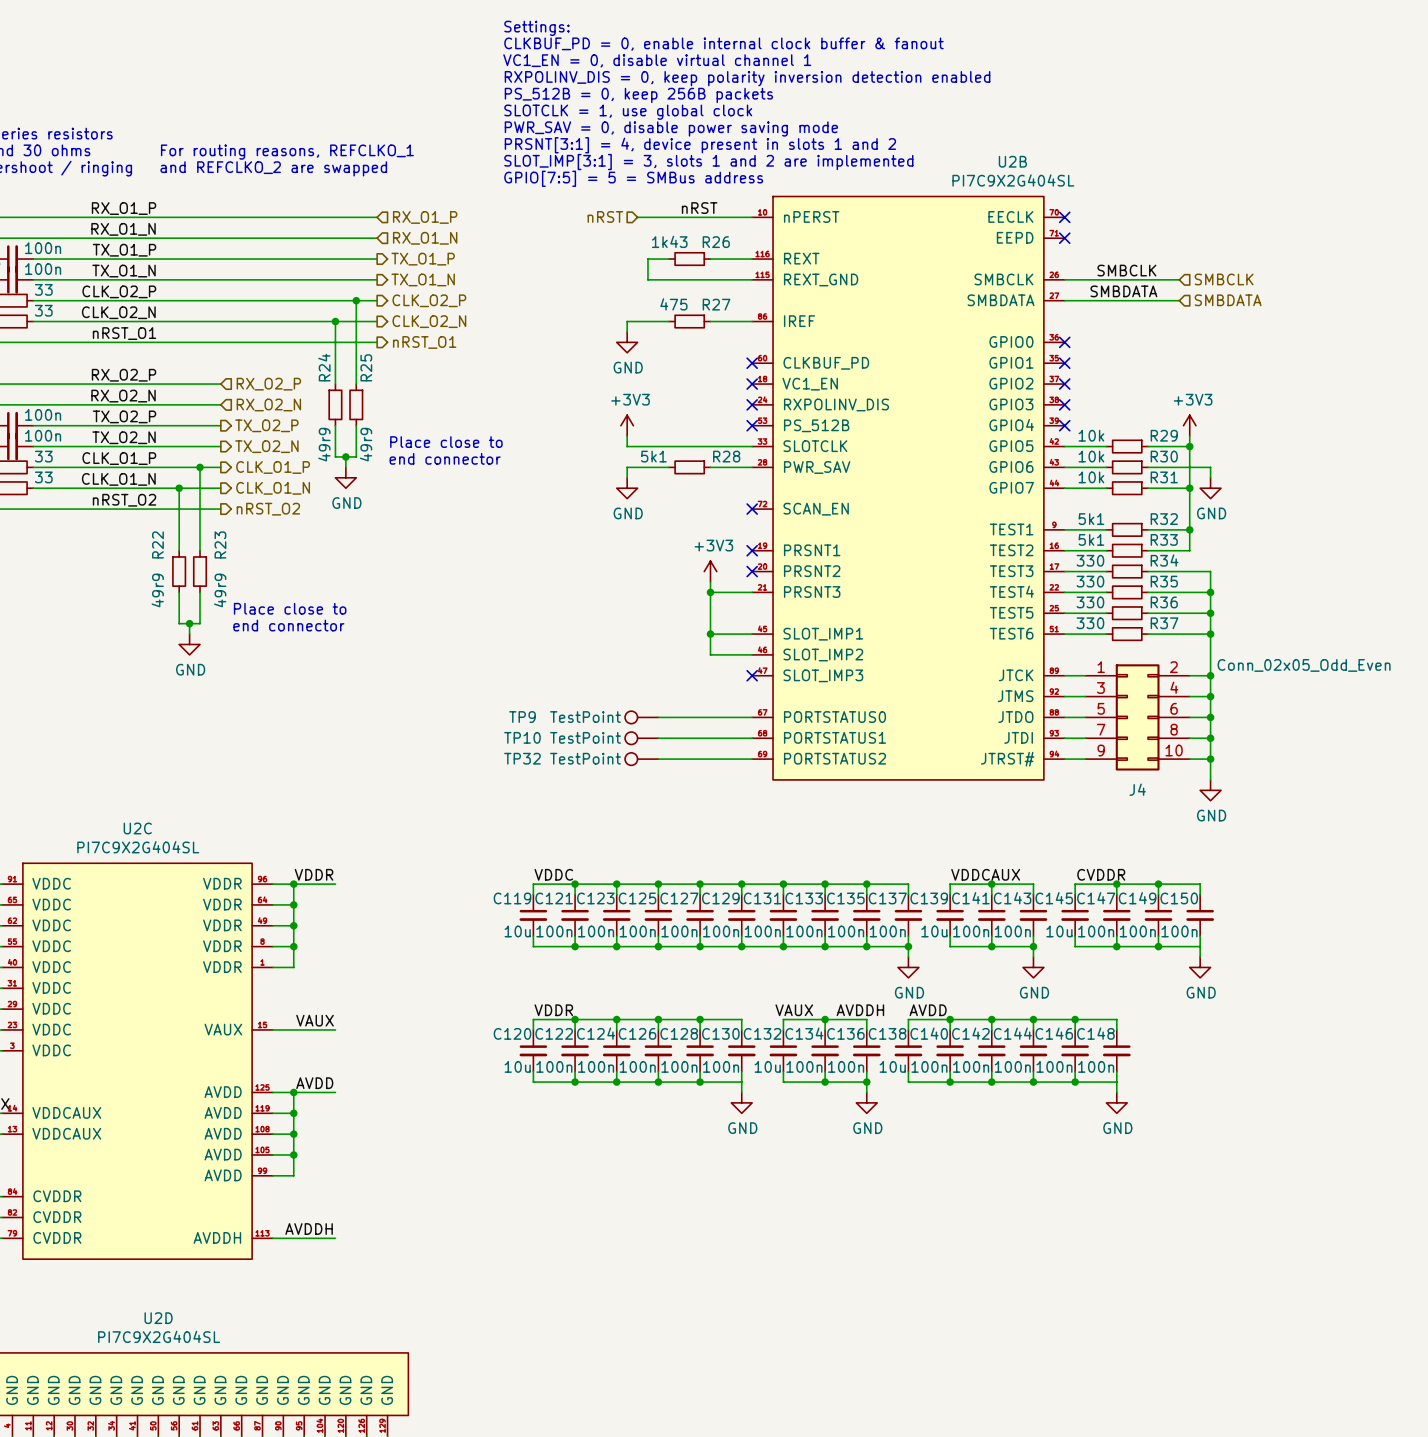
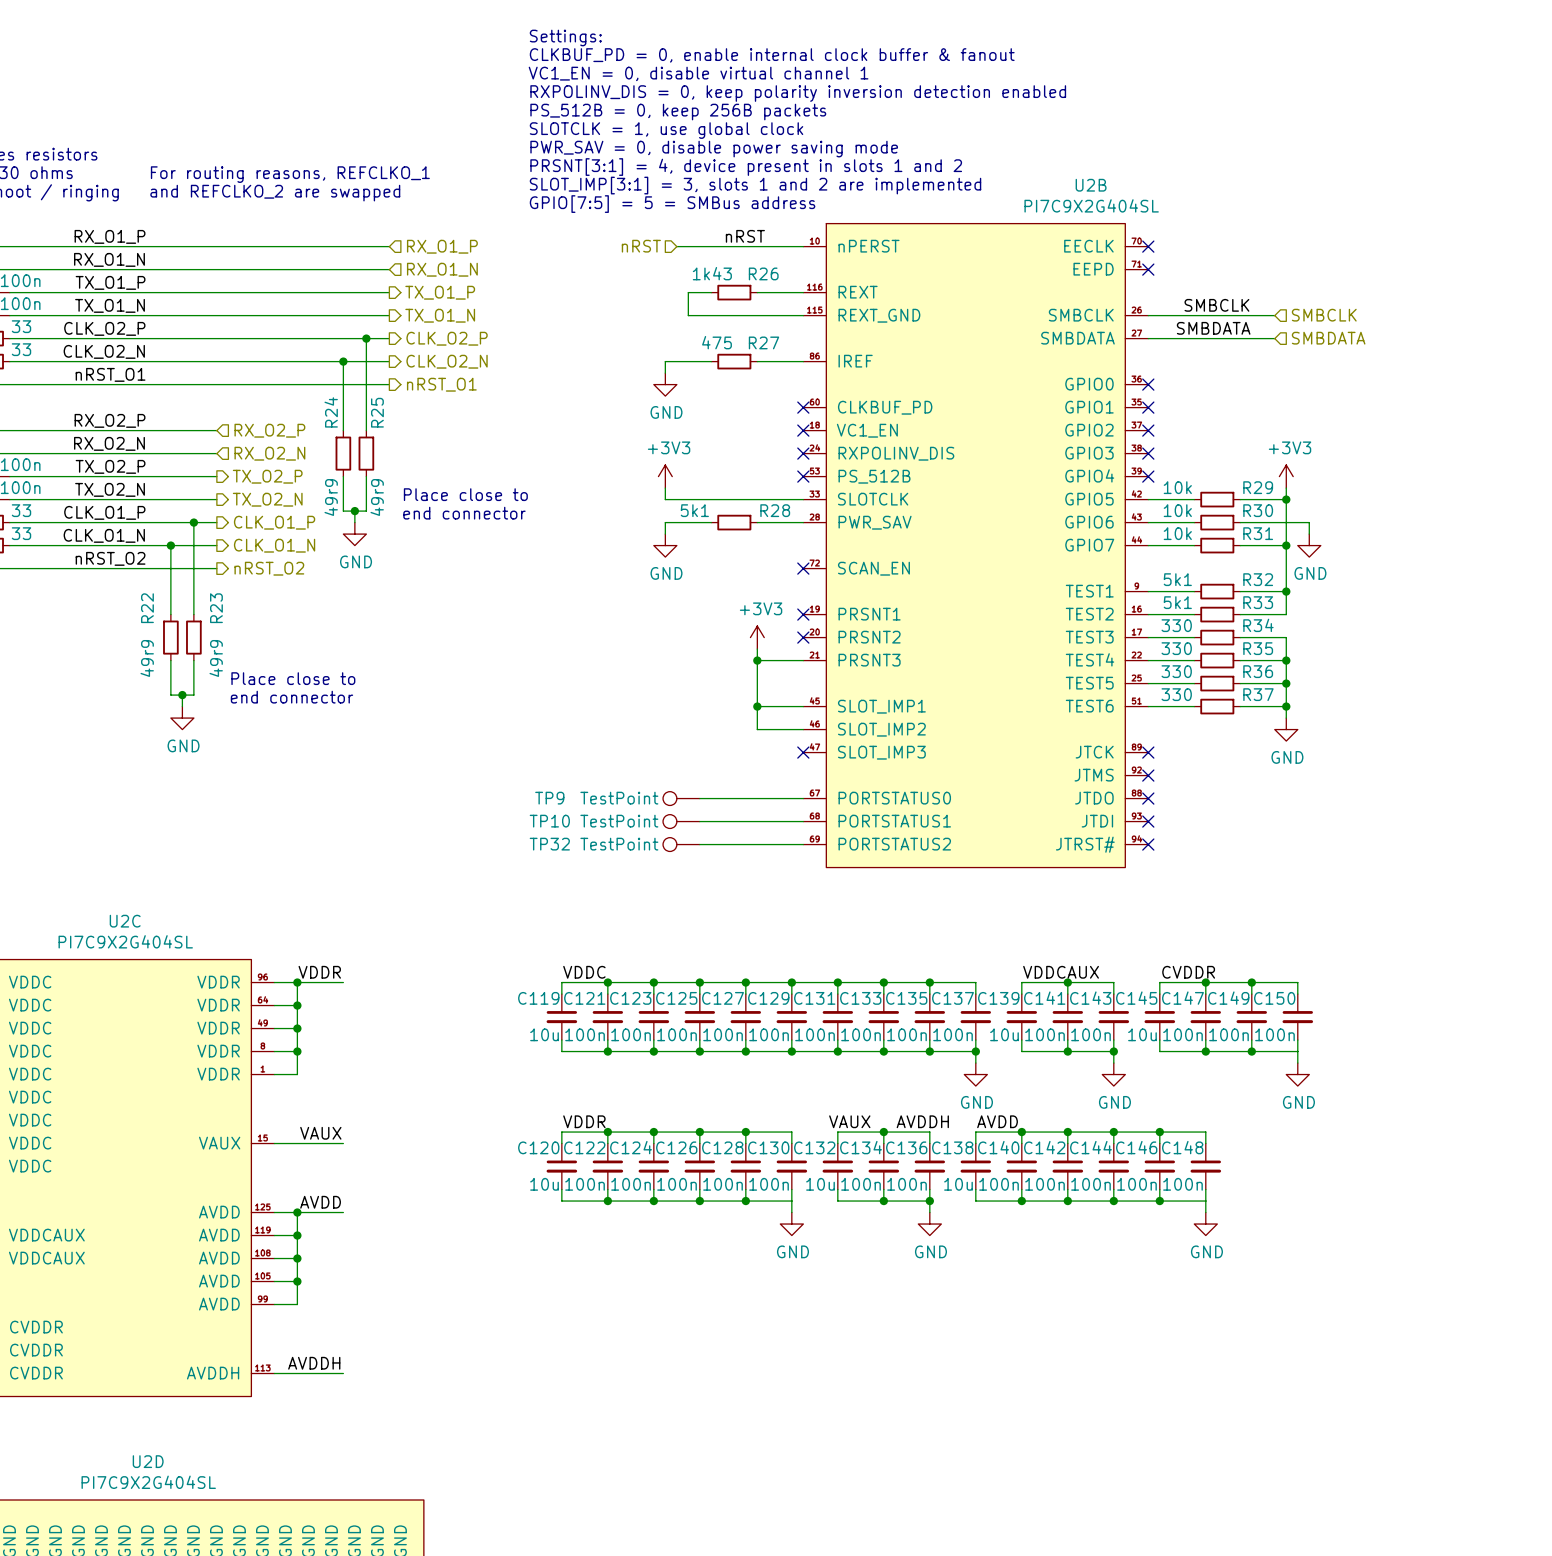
wire: (1189, 571) (1210, 571) (1210, 779) -> (1286, 637) (1286, 718)
wire: (1189, 592) (1210, 592) -> none
junction: none -> (1286, 660)
junction: (1210, 592) -> none
wire: (1189, 613) (1210, 613) -> none
junction: none -> (1286, 683)
junction: (1210, 613) -> none
wire: (1189, 634) (1210, 634) -> none
junction: none -> (1286, 706)
junction: (1210, 634) -> none
wire: (1064, 675) (1085, 675) -> none
no-connect mark: none -> (1148, 752)
wire: (1189, 675) (1210, 675) -> none
junction: (1210, 675) -> none
wire: (1064, 696) (1085, 696) -> none
no-connect mark: none -> (1148, 775)
wire: (1189, 696) (1210, 696) -> none
junction: (1210, 696) -> none
wire: (1064, 717) (1085, 717) -> none
no-connect mark: none -> (1148, 798)
J4: Conn_02x05_Odd_Even (1137, 717) -> none
wire: (1189, 717) (1210, 717) -> none
junction: (1210, 717) -> none
wire: (1064, 738) (1085, 738) -> none
no-connect mark: none -> (1148, 821)
wire: (1189, 738) (1210, 738) -> none
junction: (1210, 738) -> none
wire: (1064, 759) (1085, 759) -> none
no-connect mark: none -> (1148, 844)
wire: (1189, 759) (1210, 759) -> none
junction: (1210, 759) -> none
power symbol position: GND (1210, 790) -> GND (1286, 729)

